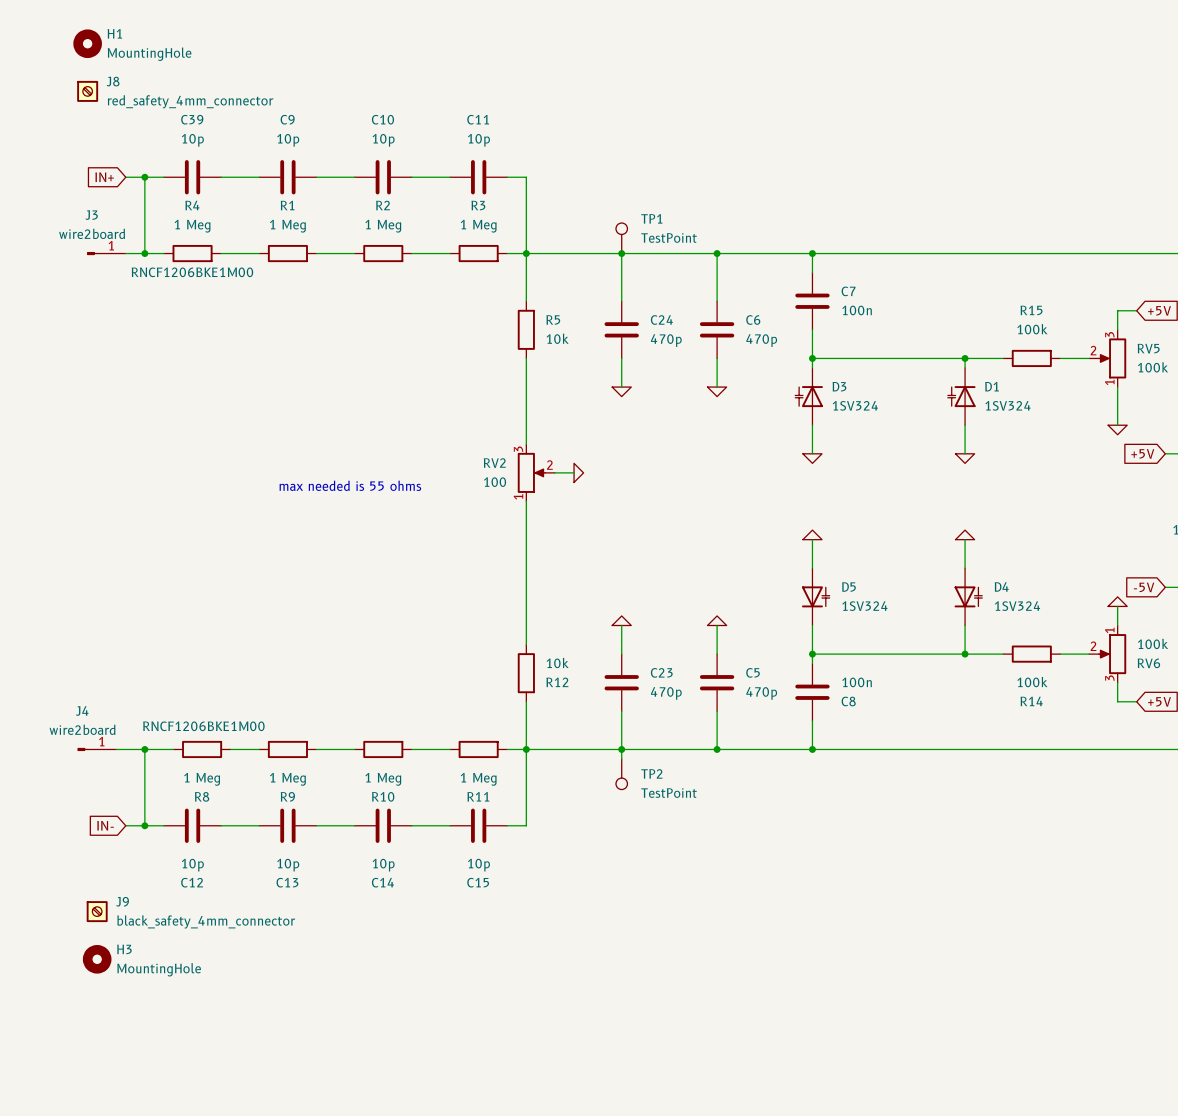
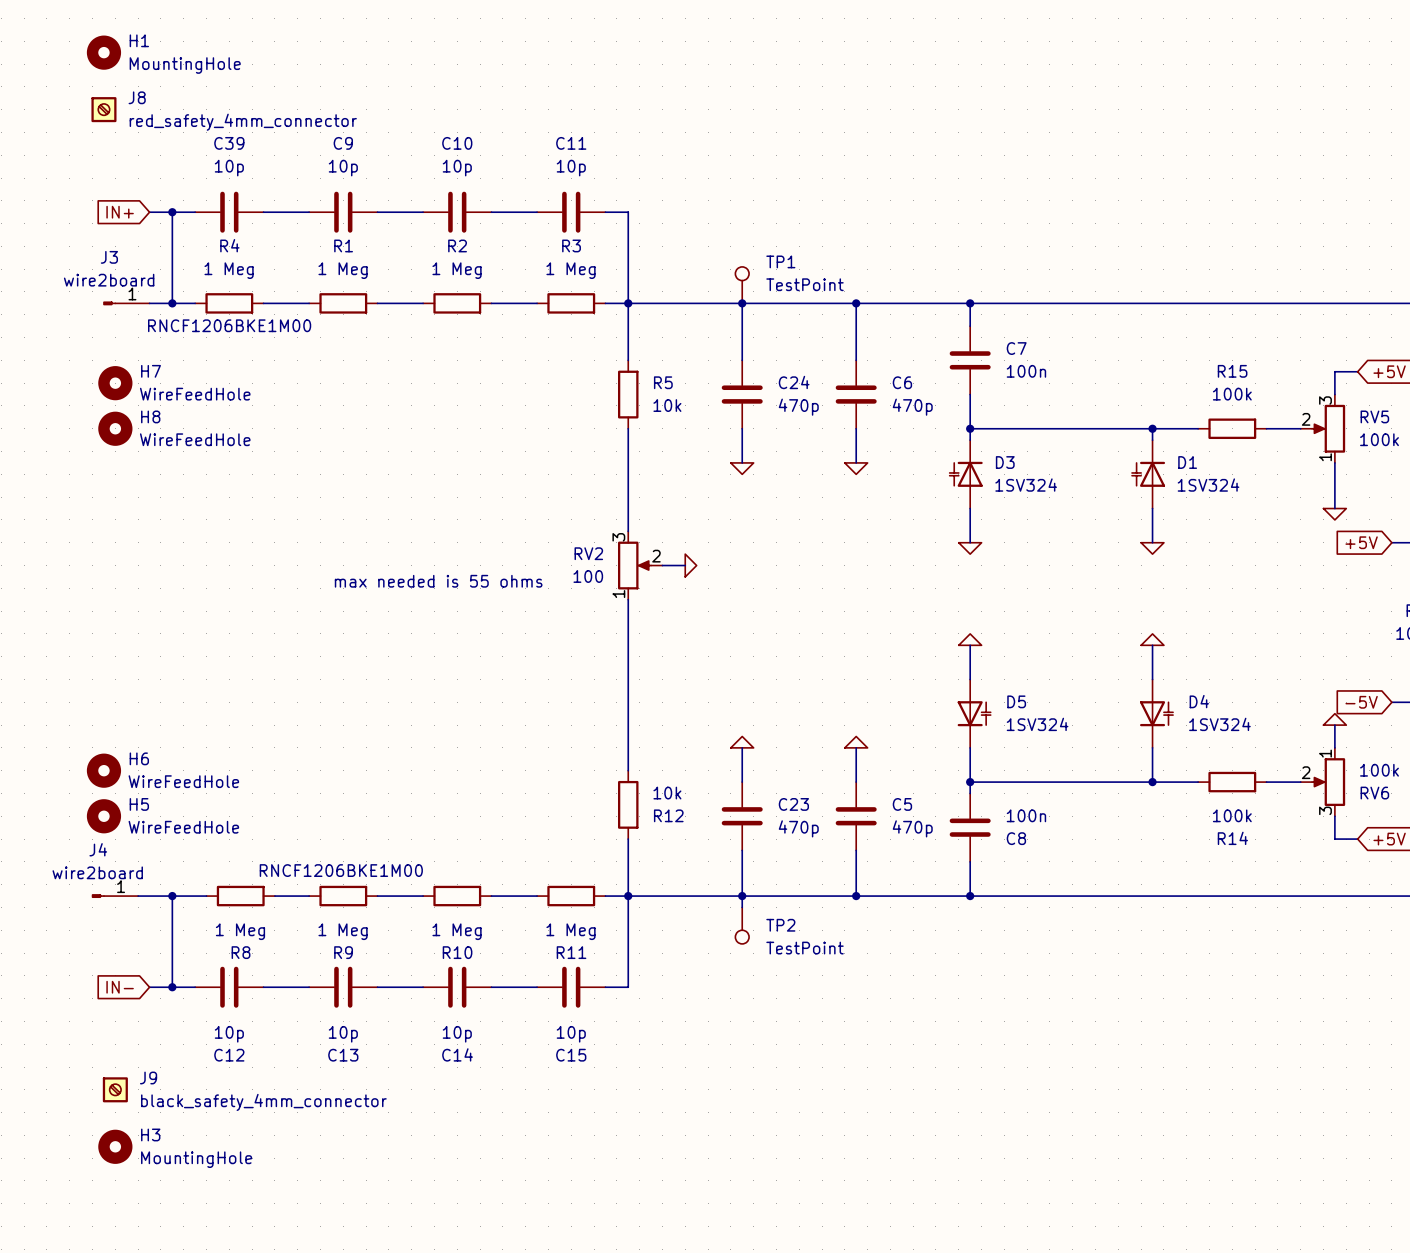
H7: none -> WireFeedHole (115, 383)
H8: none -> WireFeedHole (115, 428)
H6: none -> WireFeedHole (103, 770)
H5: none -> WireFeedHole (103, 816)
R8 text position: RNCF1206BKE1M00 (203, 726) -> RNCF1206BKE1M00 (341, 870)

